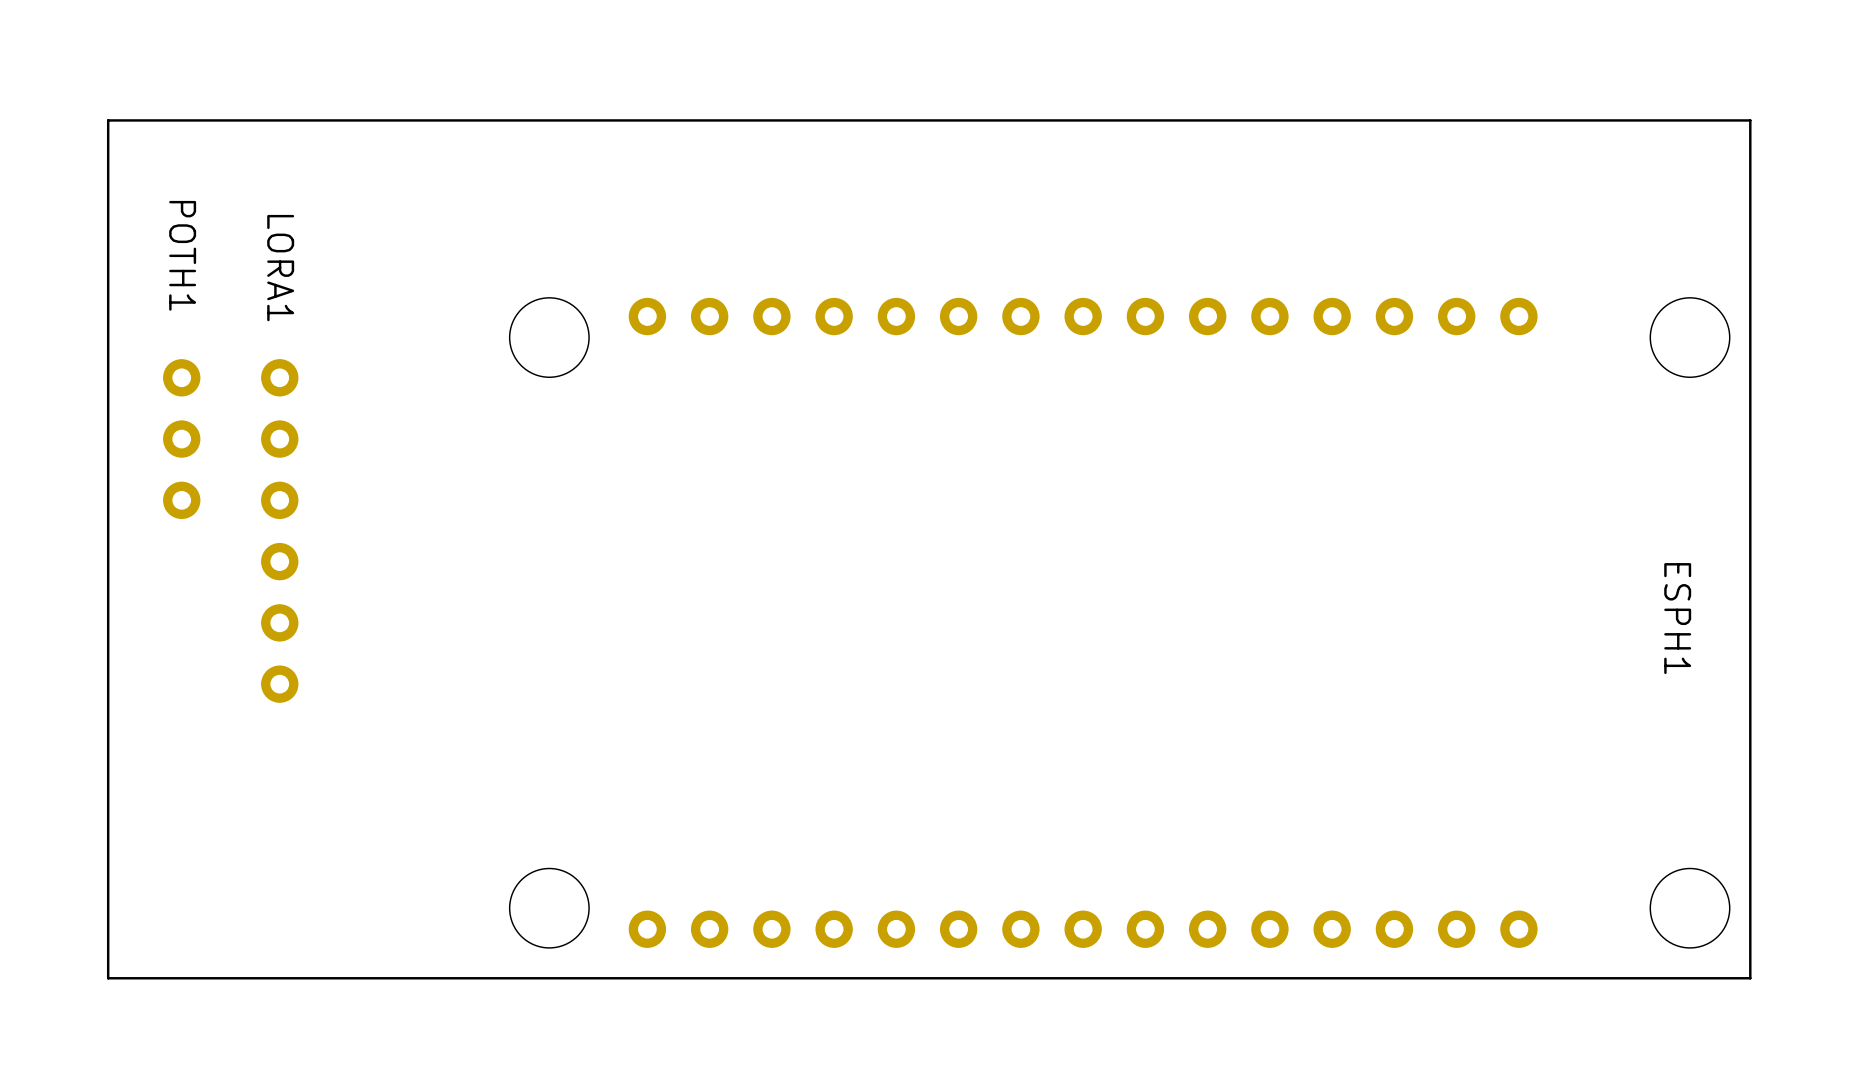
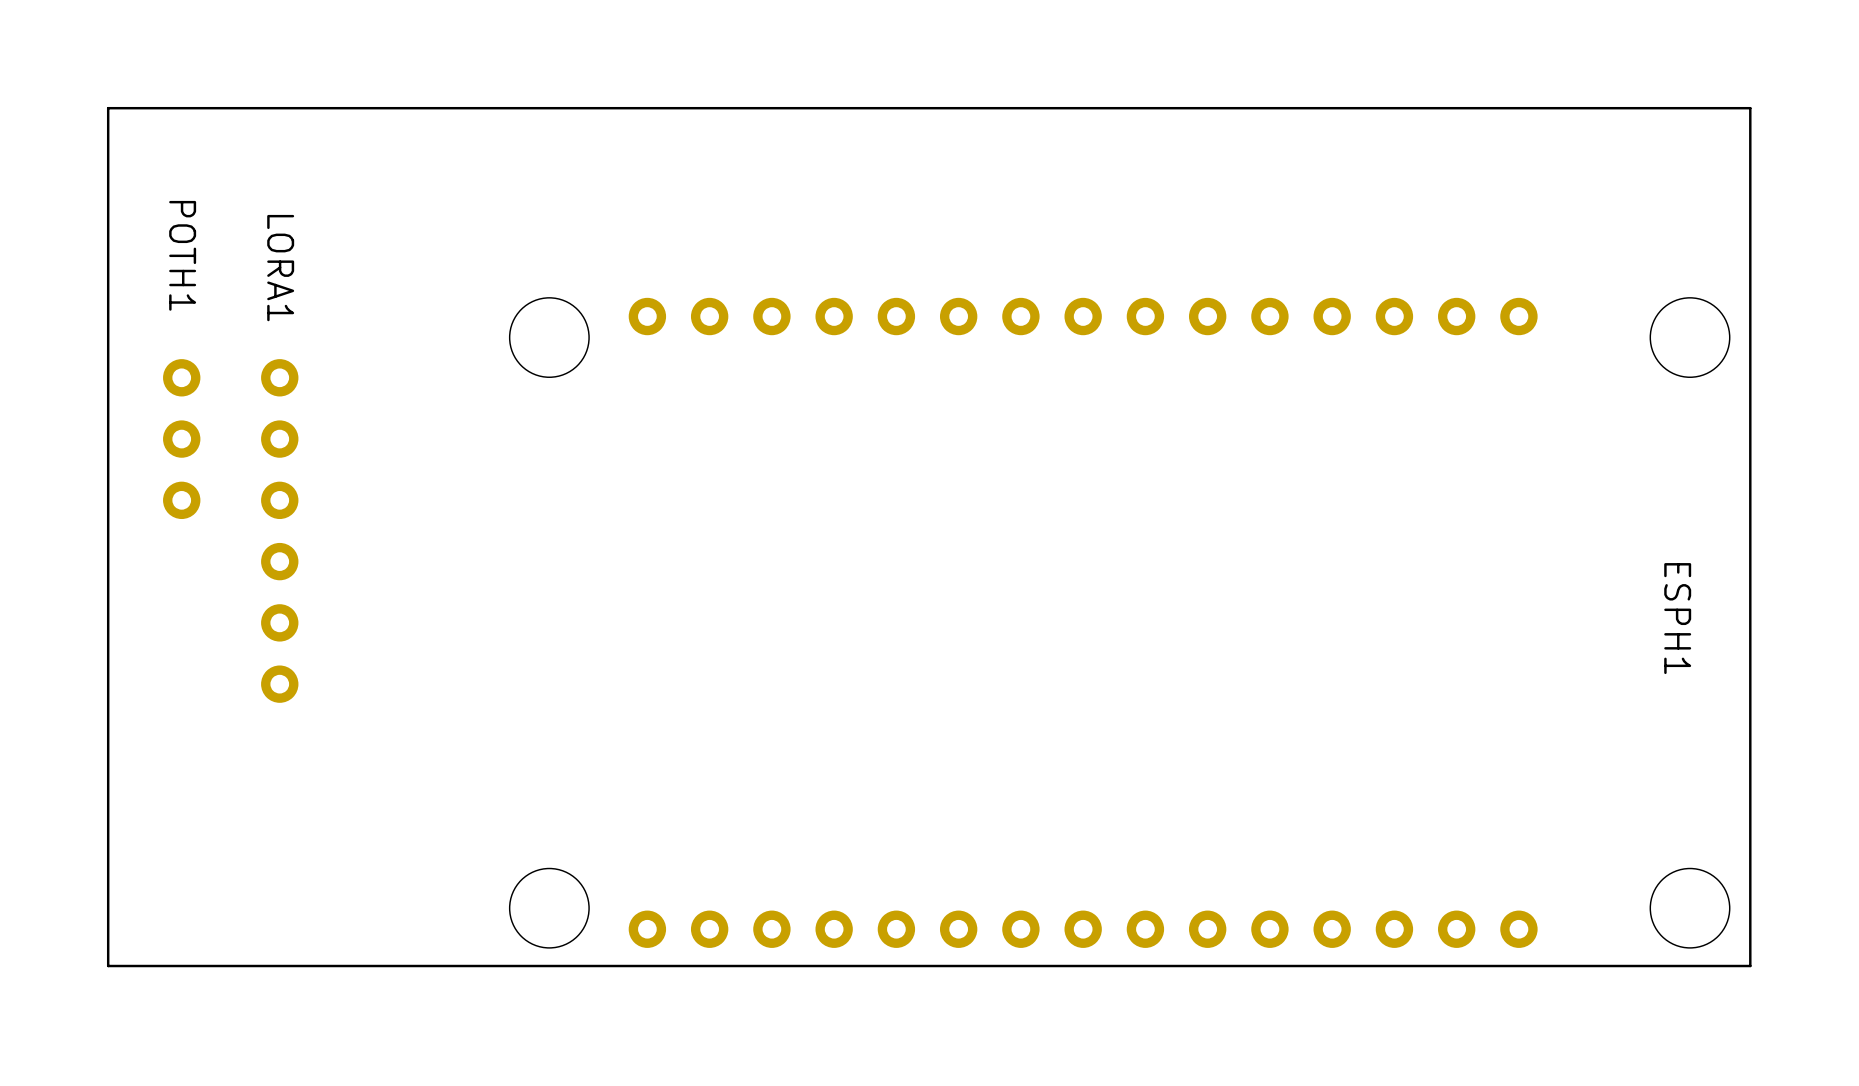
board edge: (108, 120) (1750, 120) -> (108, 120) (108, 108) (1750, 108) (1750, 120)
board edge: (108, 966) (108, 978) (1750, 978) (1750, 966) -> (108, 966) (1750, 966)

